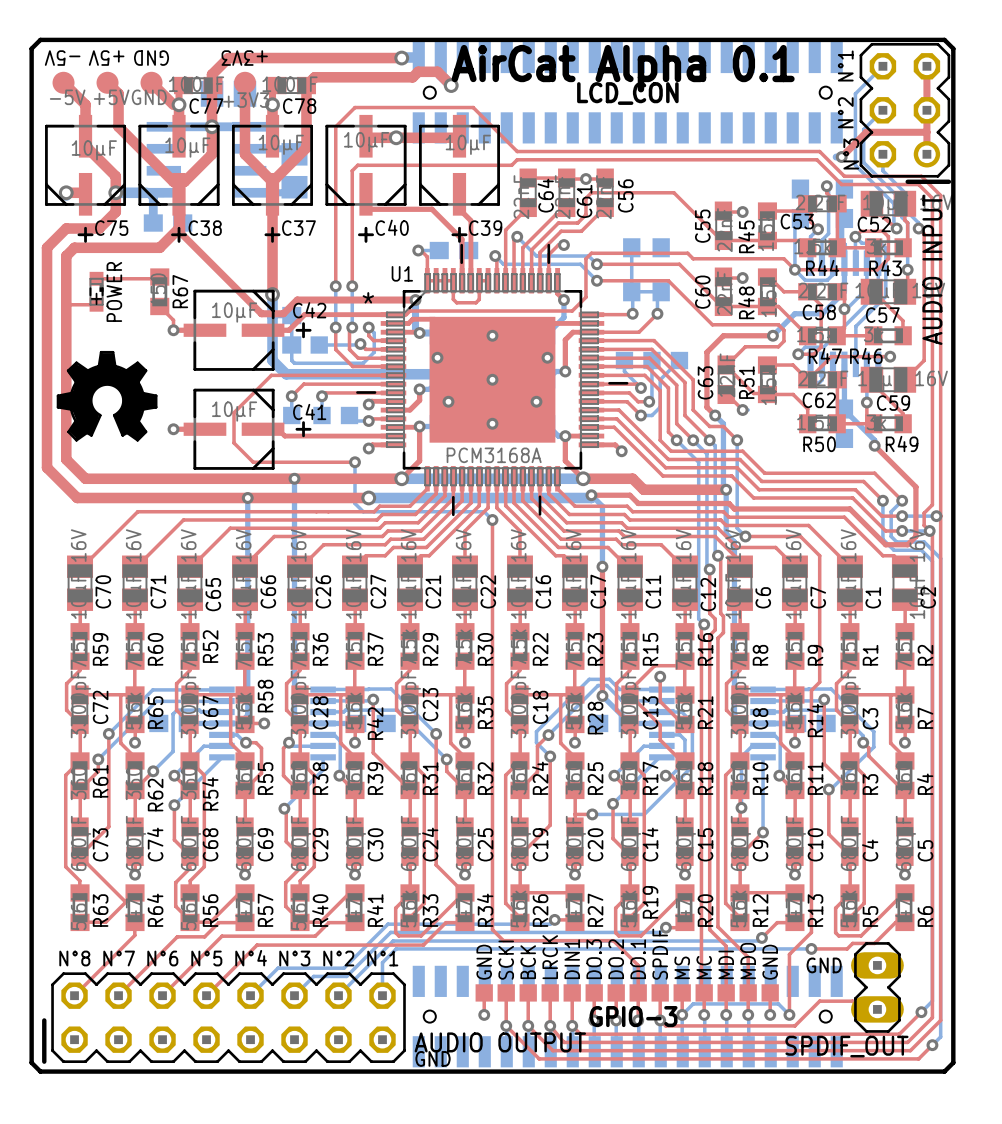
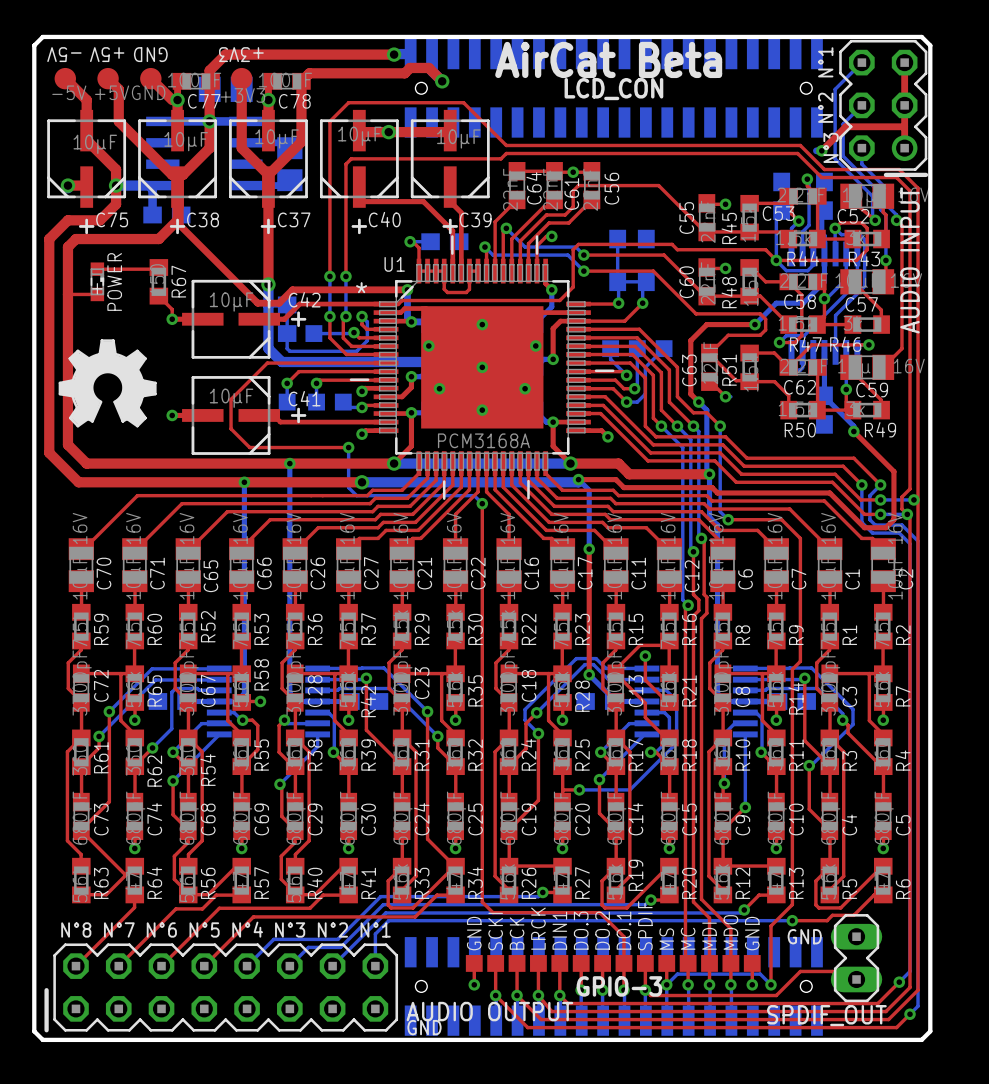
text: AirCat Alpha 0.1 (623, 68) -> AirCat Beta (608, 59)

